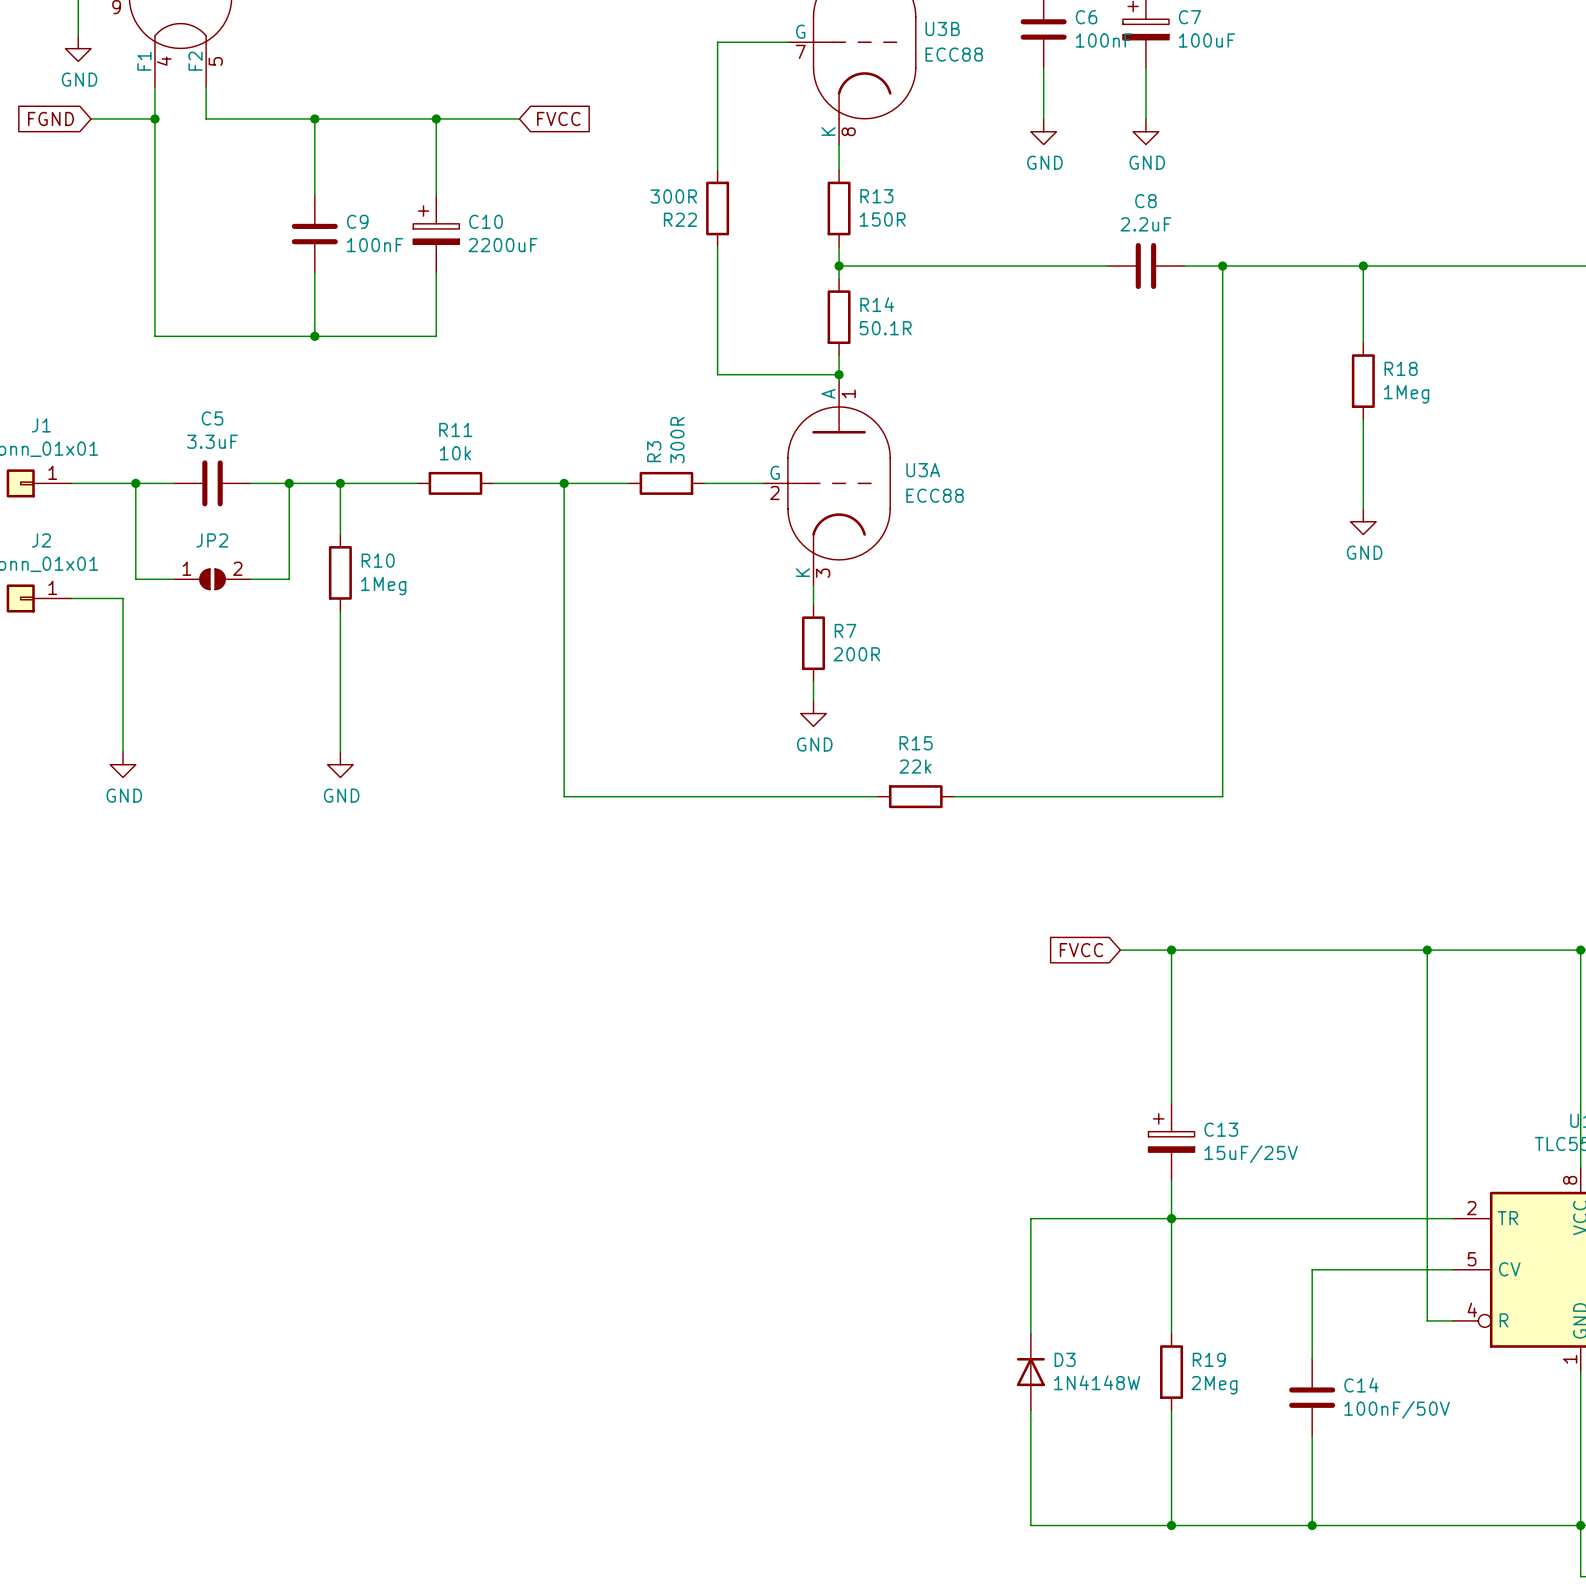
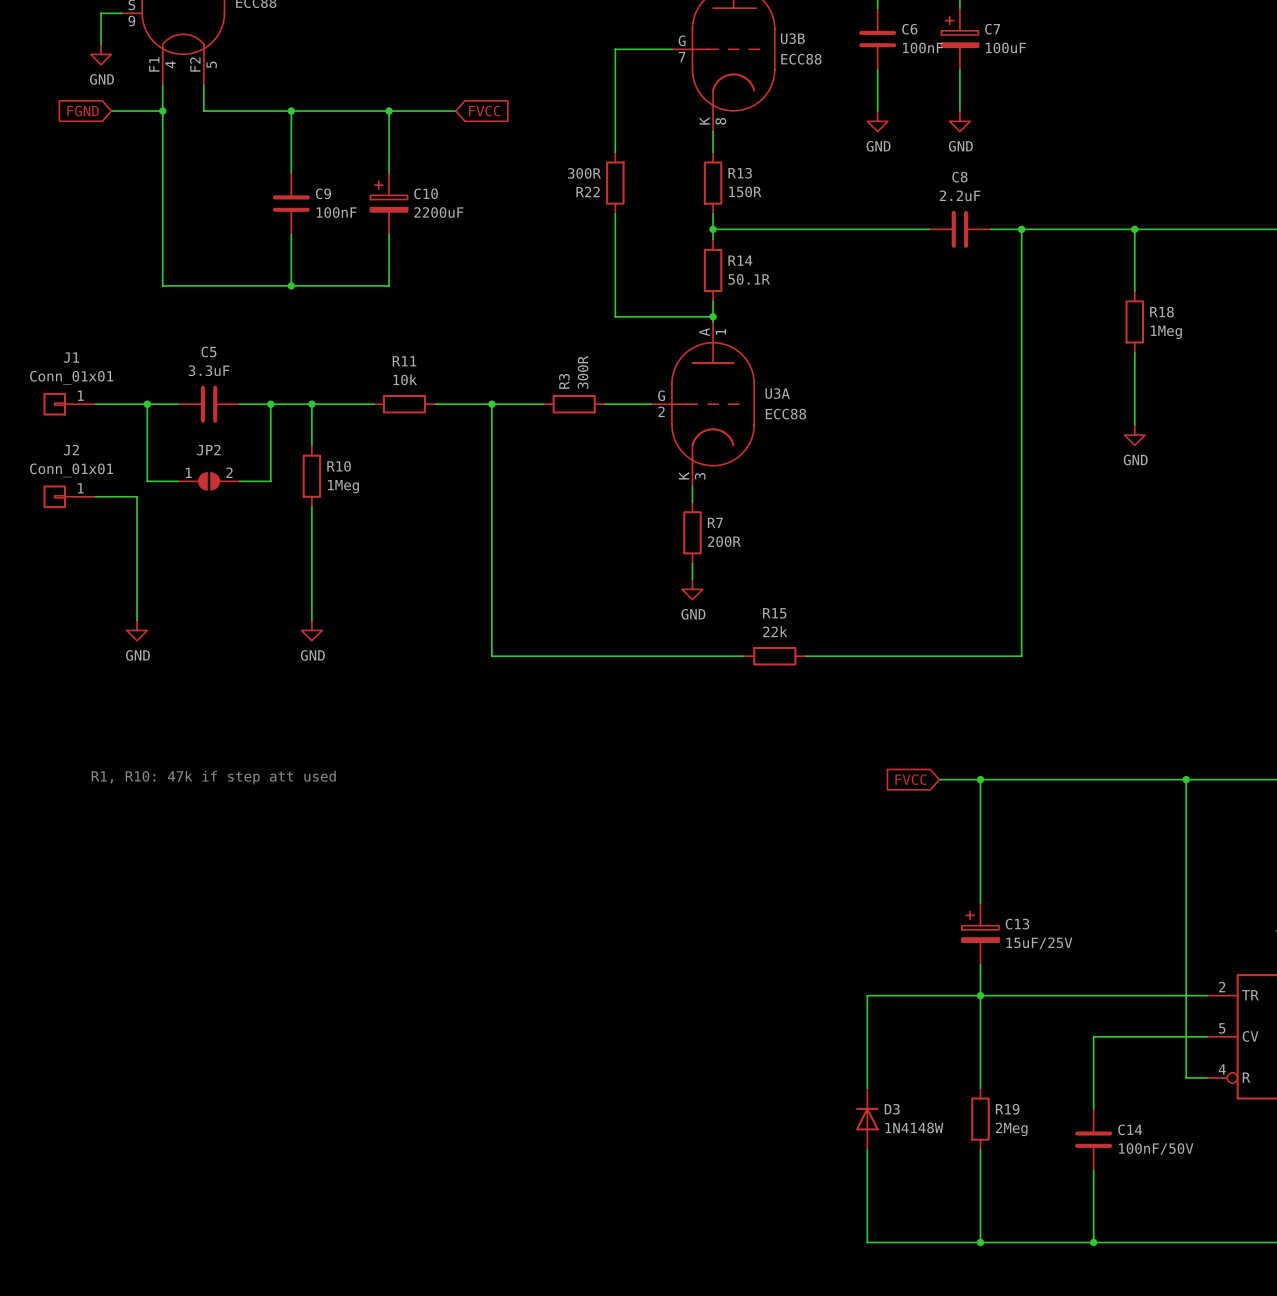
text: none -> R1, R10: 47k if step att used (213, 777)

